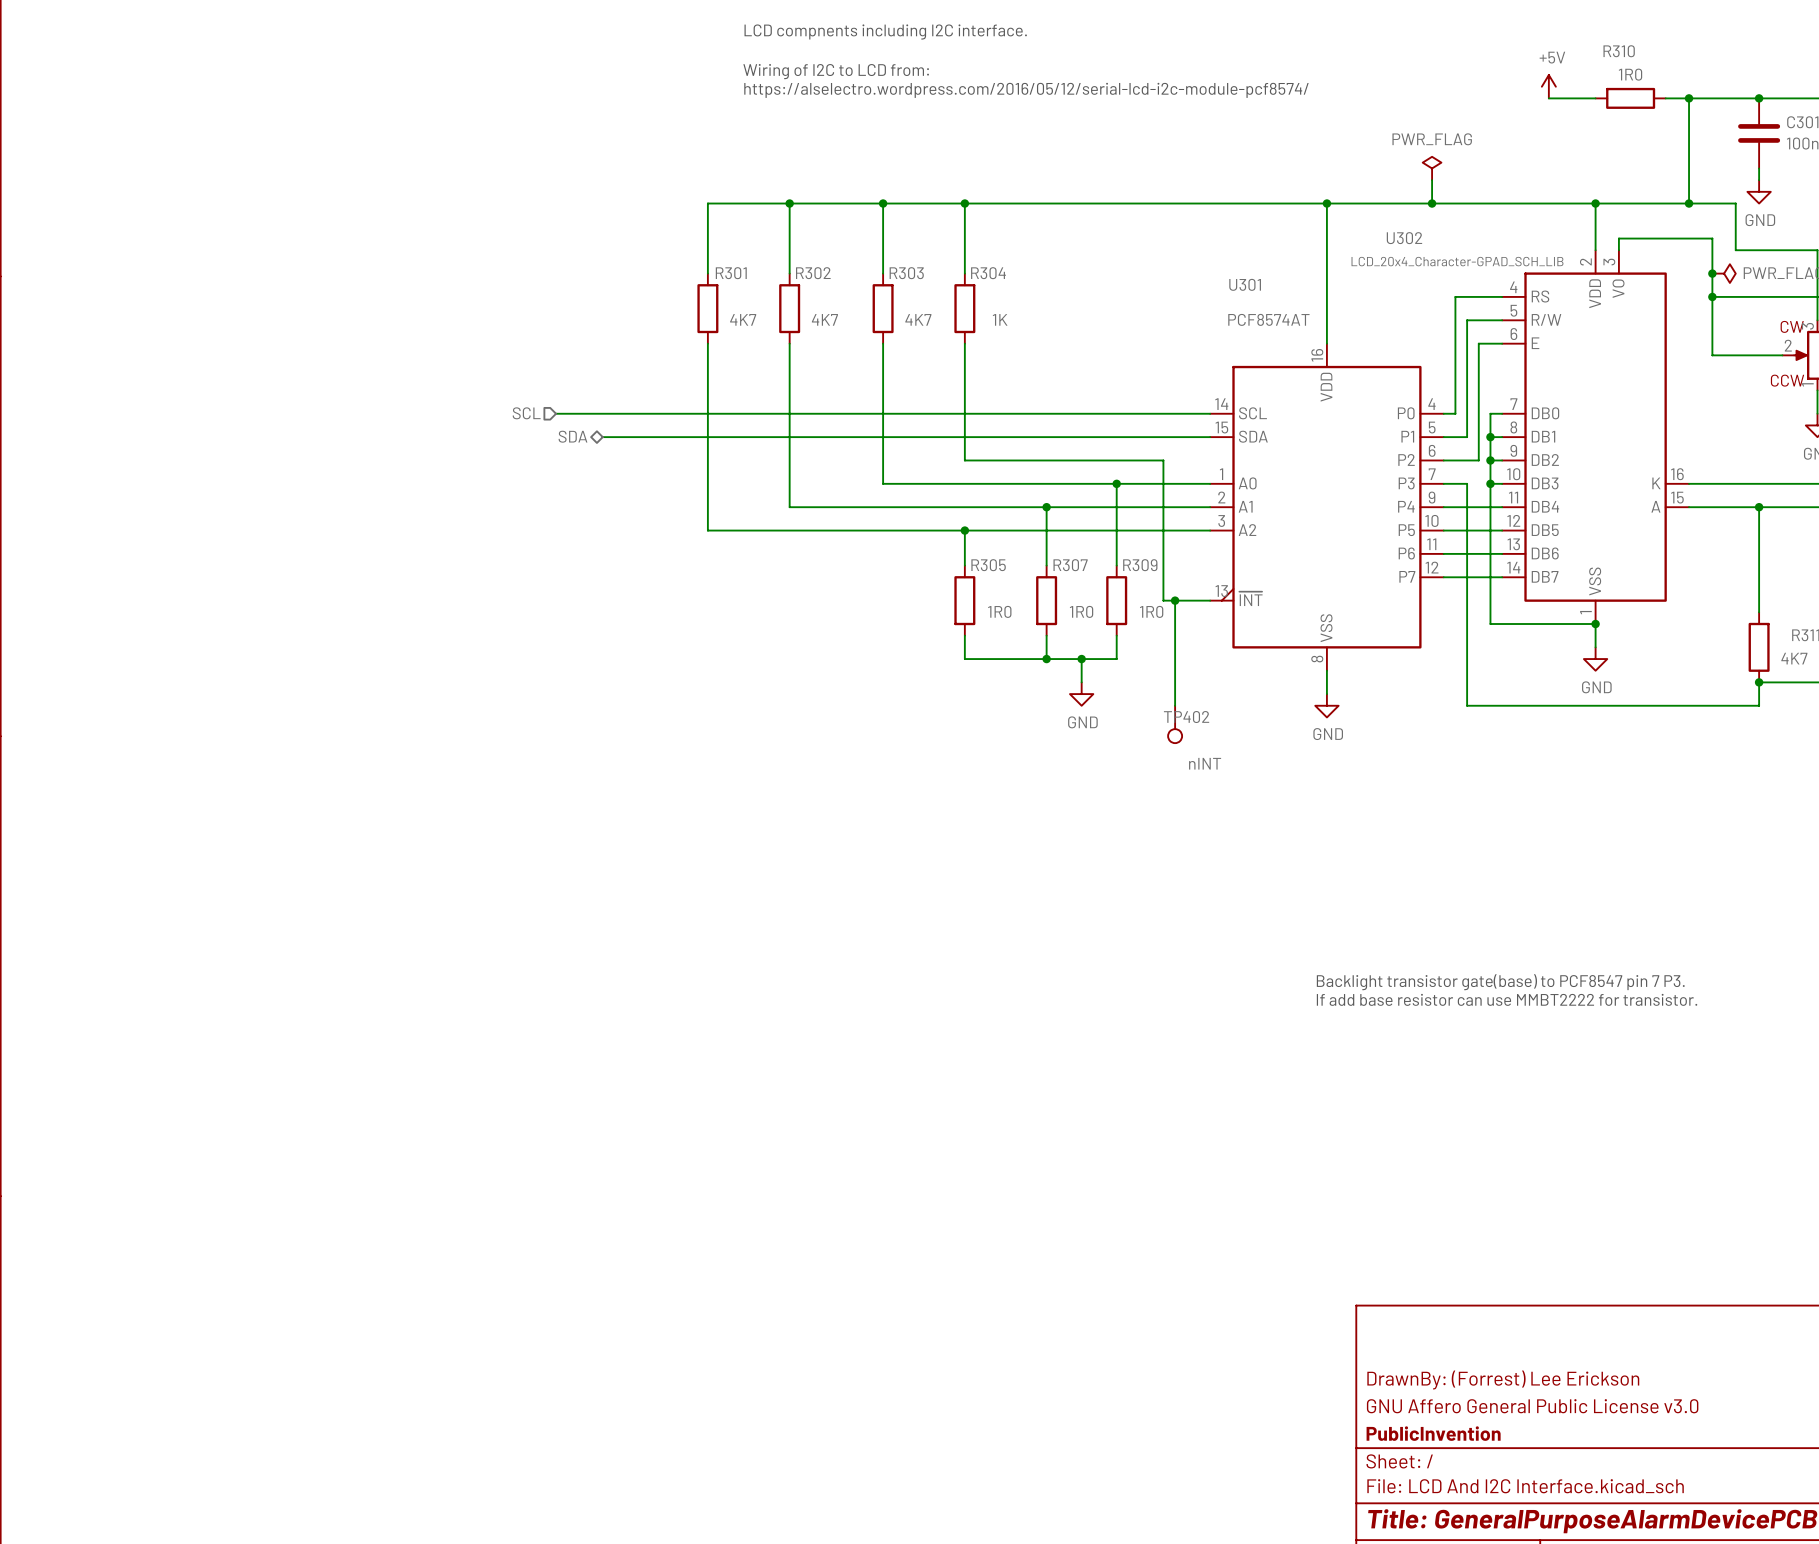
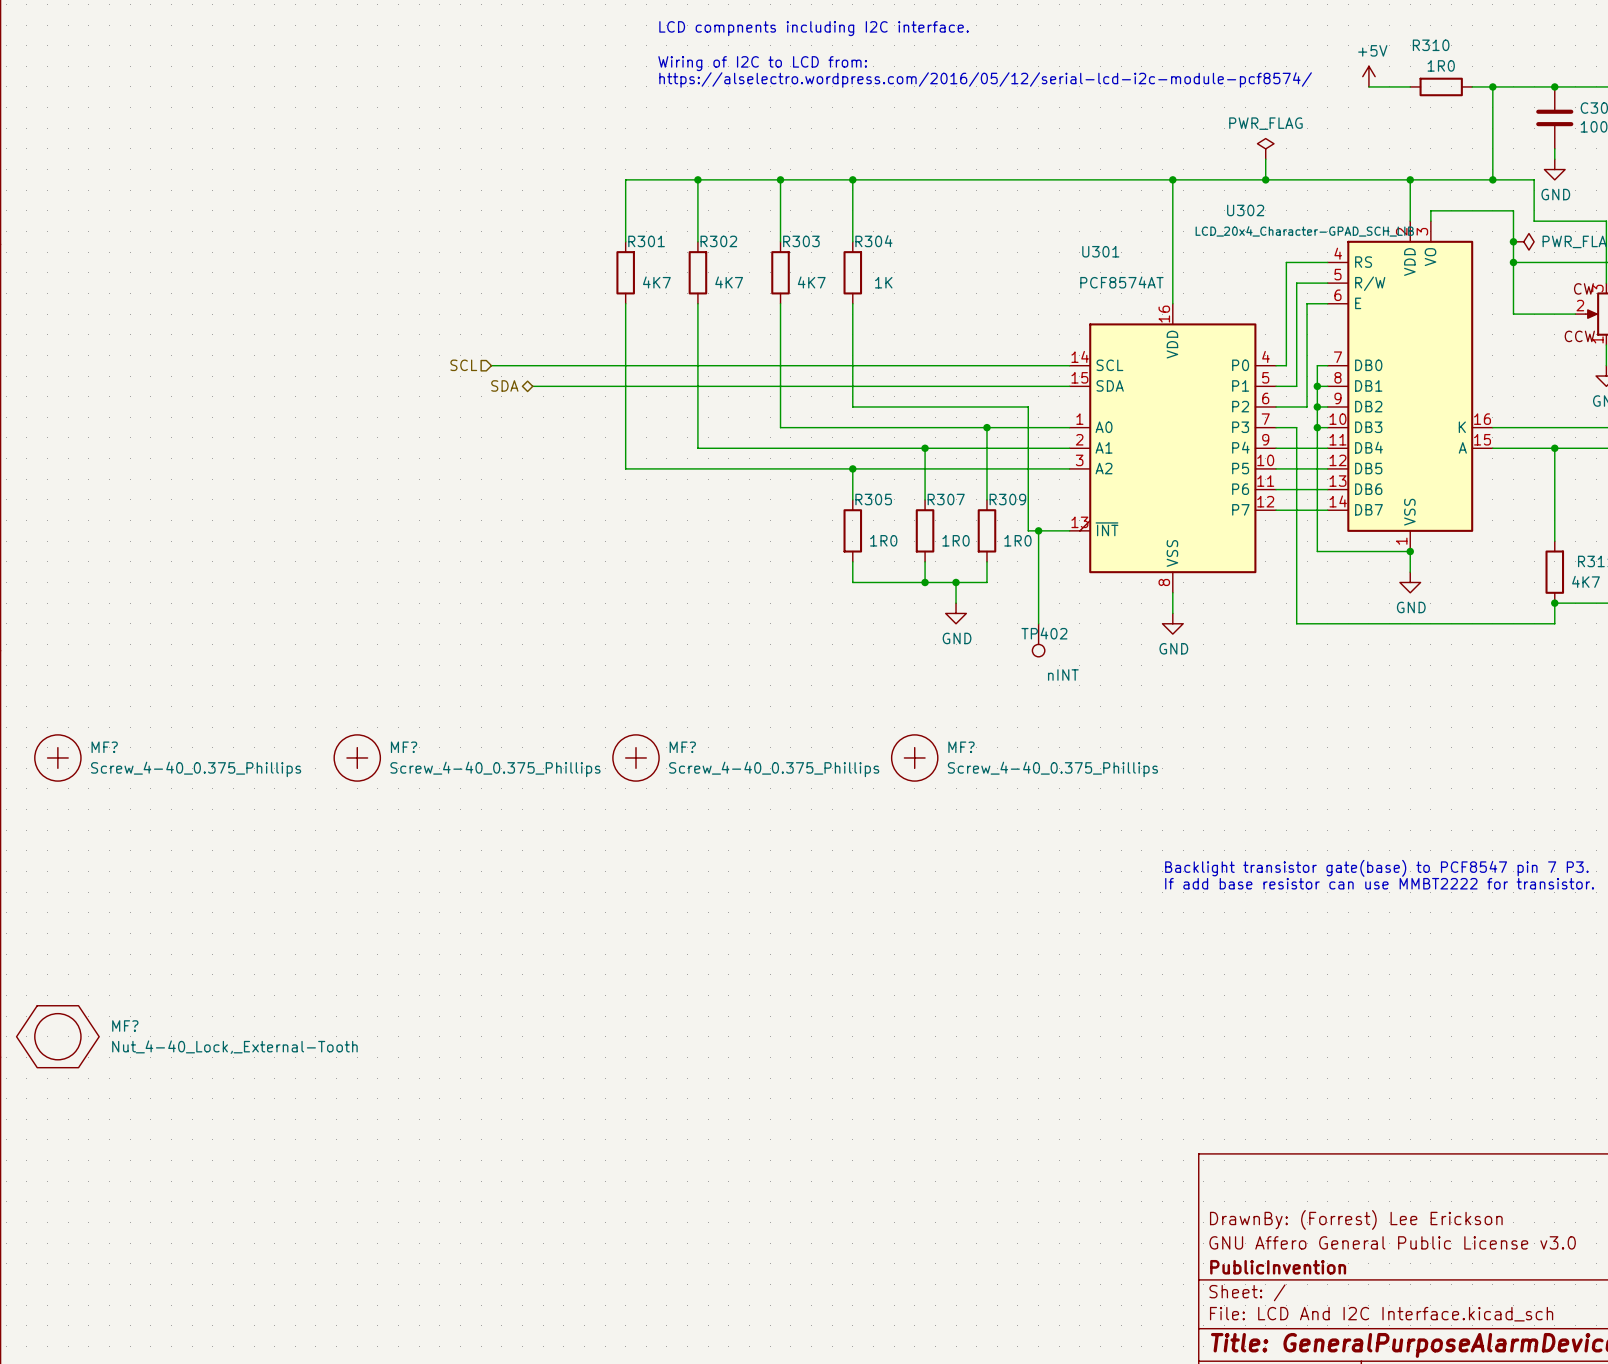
MF?: none -> Screw_4-40_0.375_Phillips (57, 757)
MF?: none -> Screw_4-40_0.375_Phillips (357, 757)
MF?: none -> Screw_4-40_0.375_Phillips (635, 757)
MF?: none -> Screw_4-40_0.375_Phillips (914, 757)
MF?: none -> Nut_4-40_Lock,_External-Tooth (57, 1036)

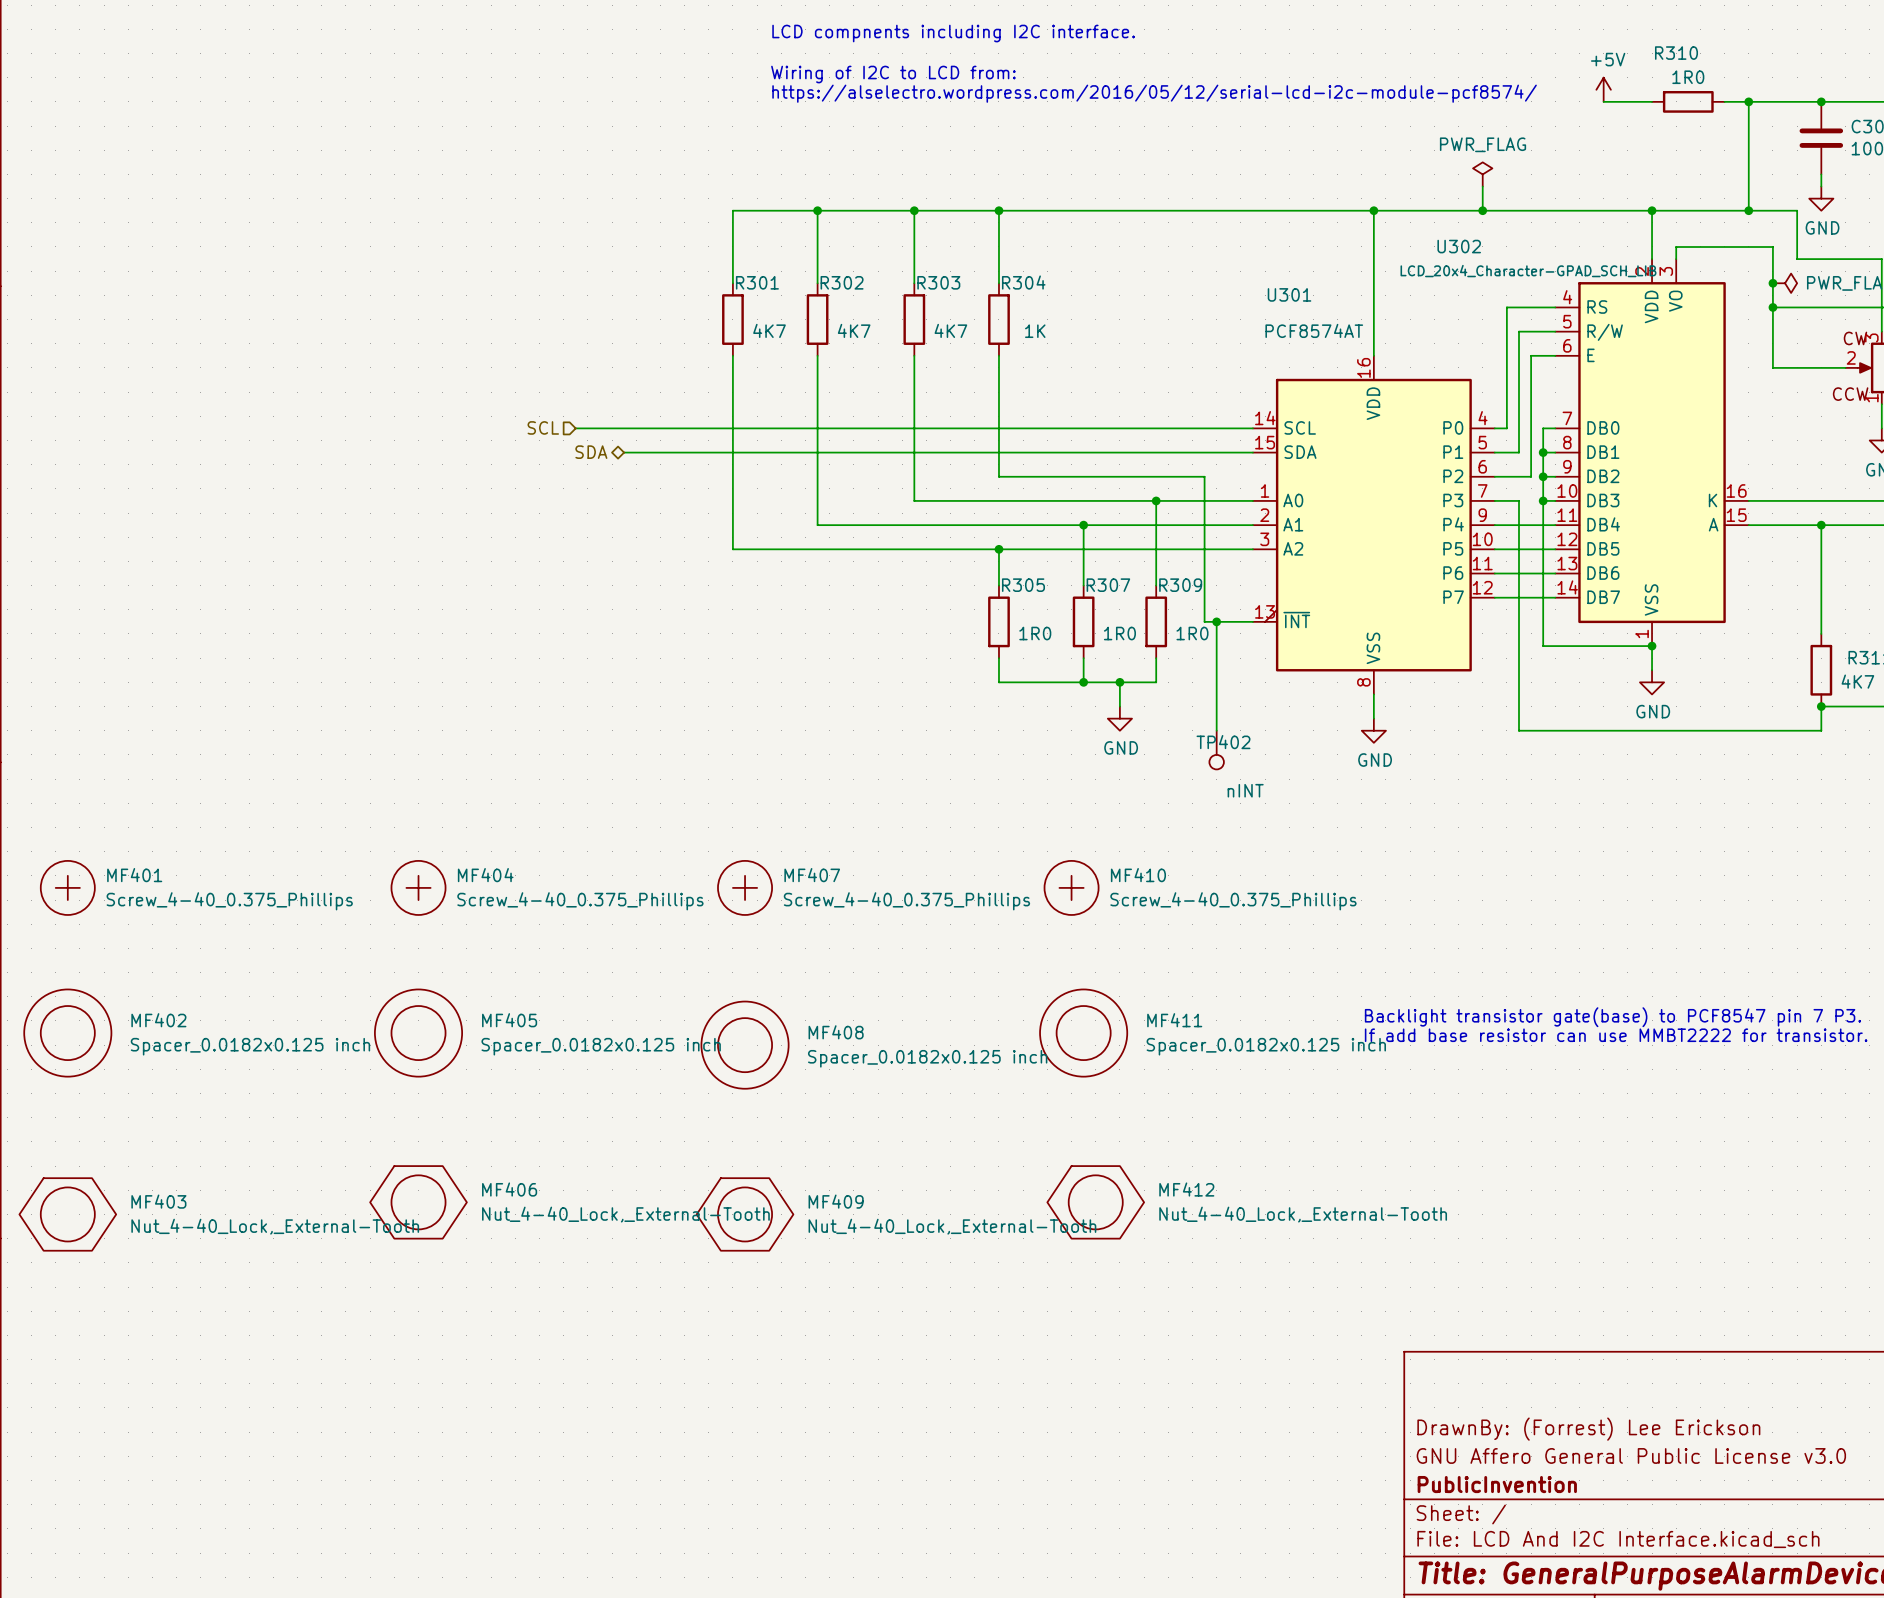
MF? name: MF? (104, 747) -> MF401 (134, 875)
MF? name: MF? (404, 747) -> MF404 (485, 875)
MF? name: MF? (682, 747) -> MF407 (812, 875)
MF? name: MF? (961, 747) -> MF410 (1138, 875)
MF402: none -> Spacer_0.0182x0.125 inch (67, 1033)
MF405: none -> Spacer_0.0182x0.125 inch (418, 1033)
MF411: none -> Spacer_0.0182x0.125 inch (1083, 1033)
MF408: none -> Spacer_0.0182x0.125 inch (745, 1045)
MF? name: MF? (125, 1026) -> MF403 (158, 1201)
MF406: none -> Nut_4-40_Lock,_External-Tooth (418, 1202)
MF412: none -> Nut_4-40_Lock,_External-Tooth (1095, 1202)
MF409: none -> Nut_4-40_Lock,_External-Tooth (745, 1214)

